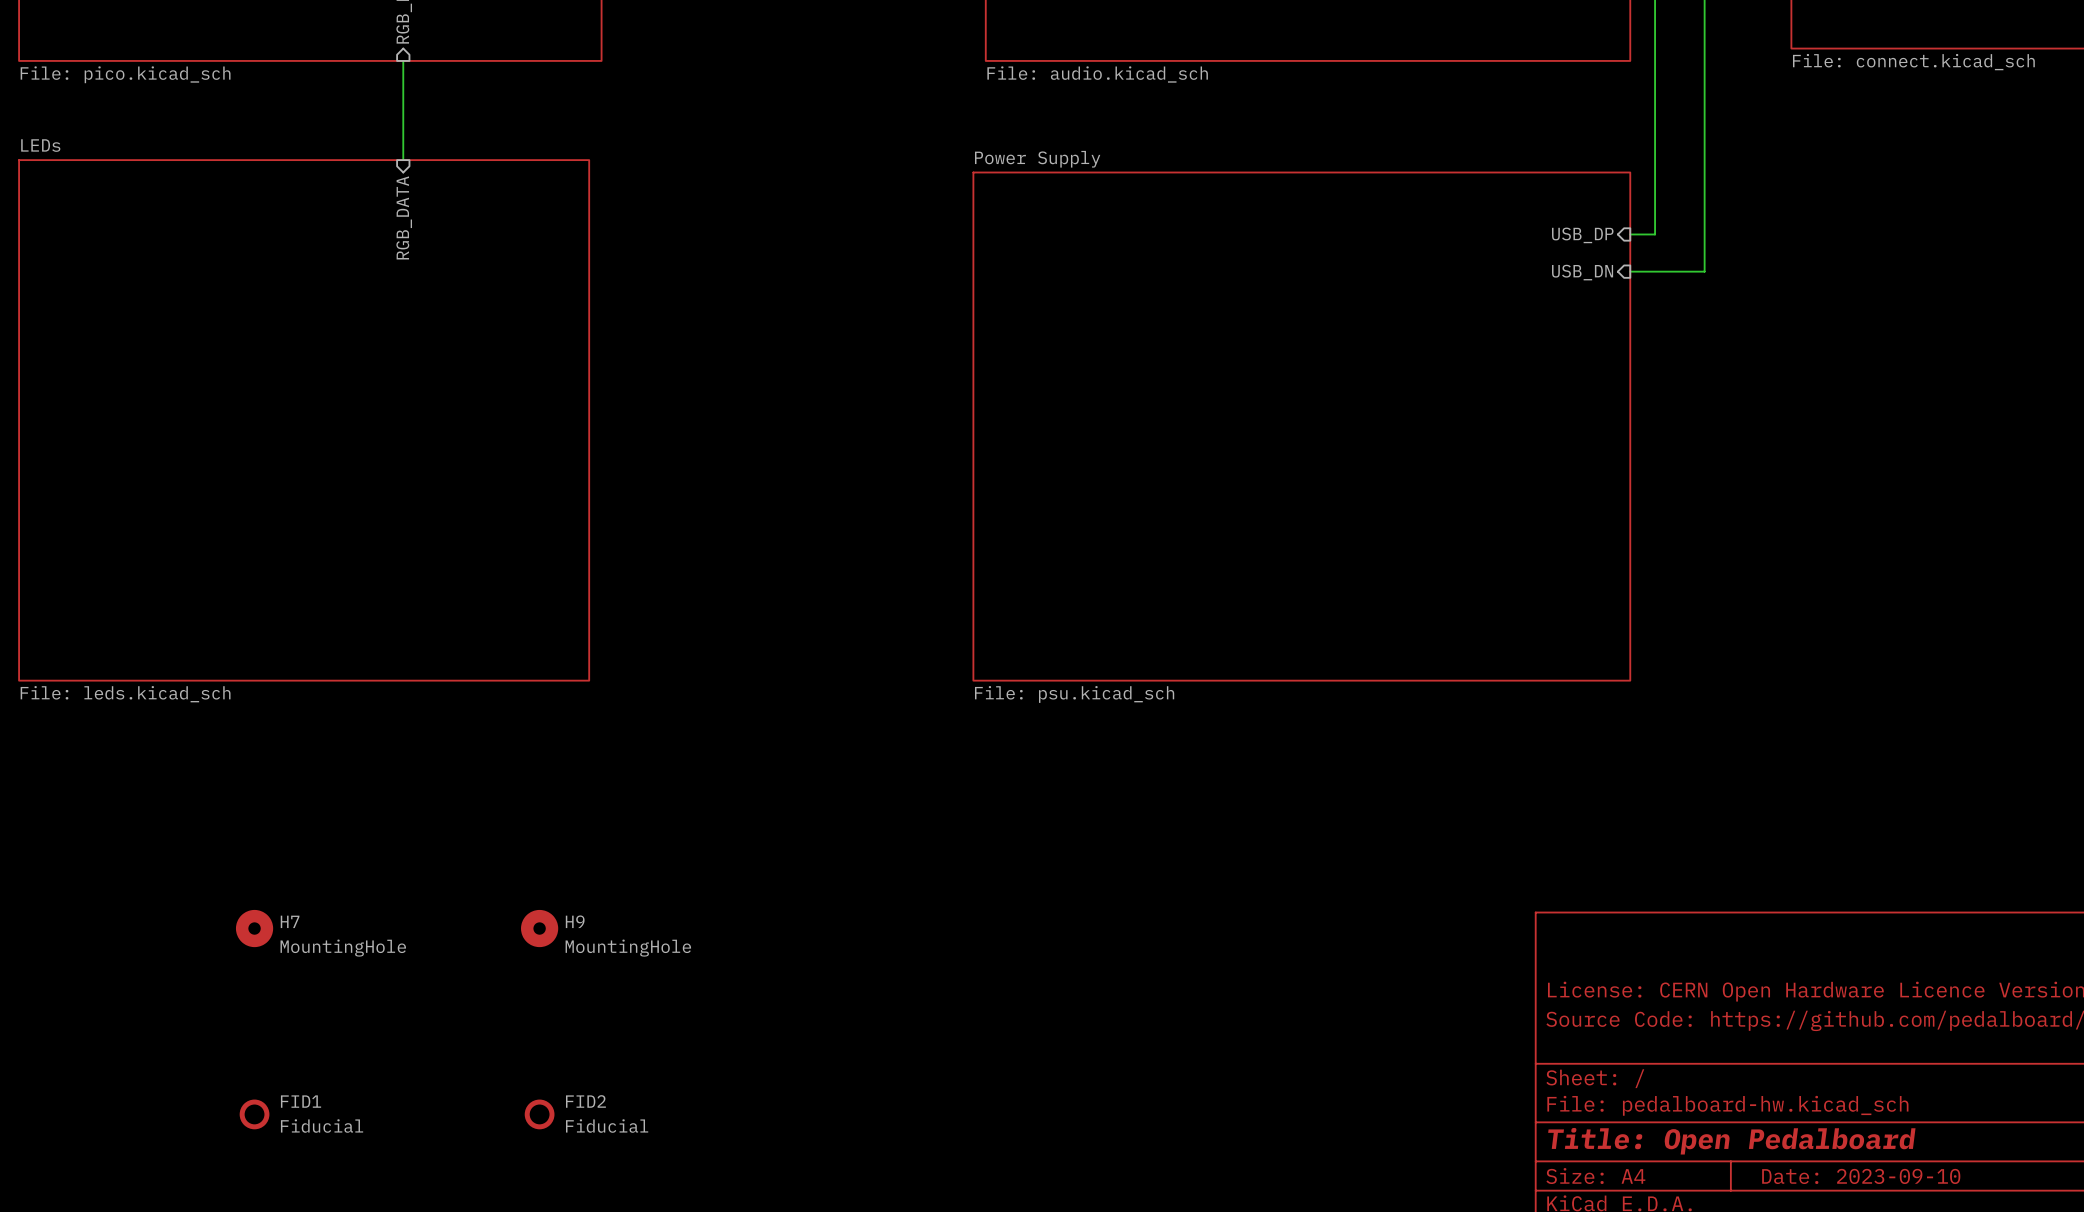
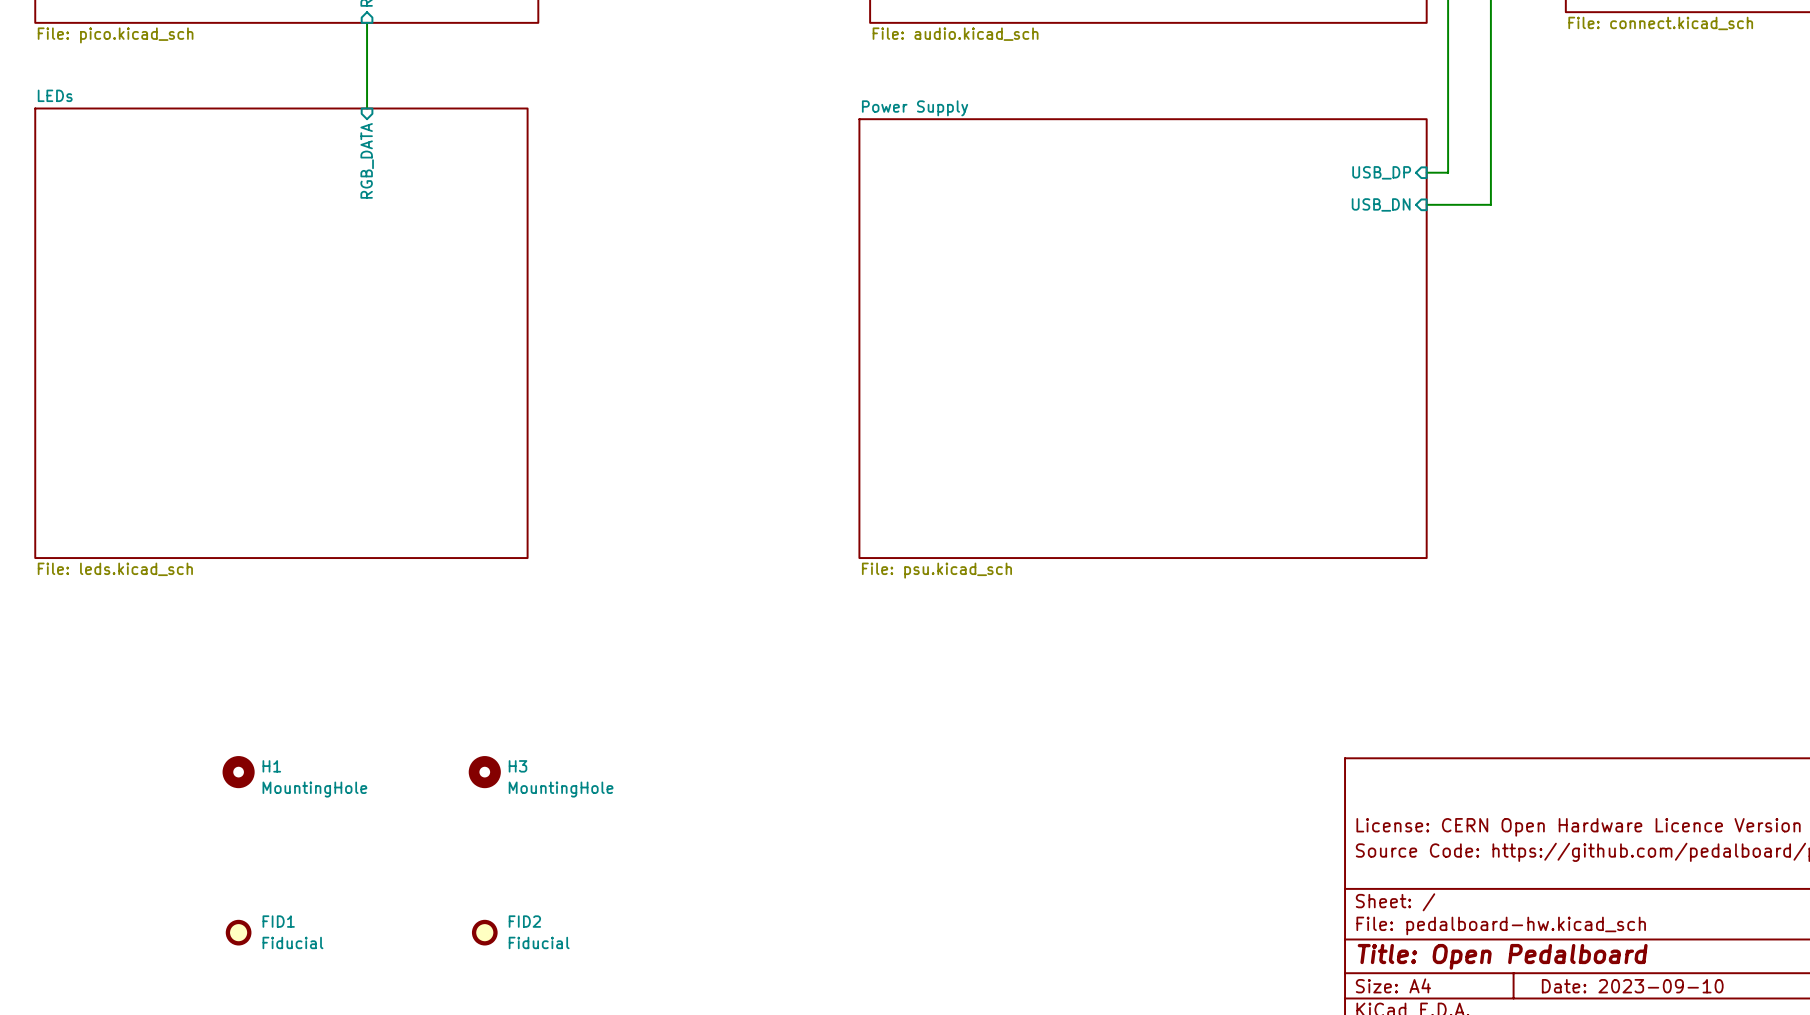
H7 name: H7 (290, 921) -> H1 (271, 766)
H9 name: H9 (575, 921) -> H3 (517, 766)

